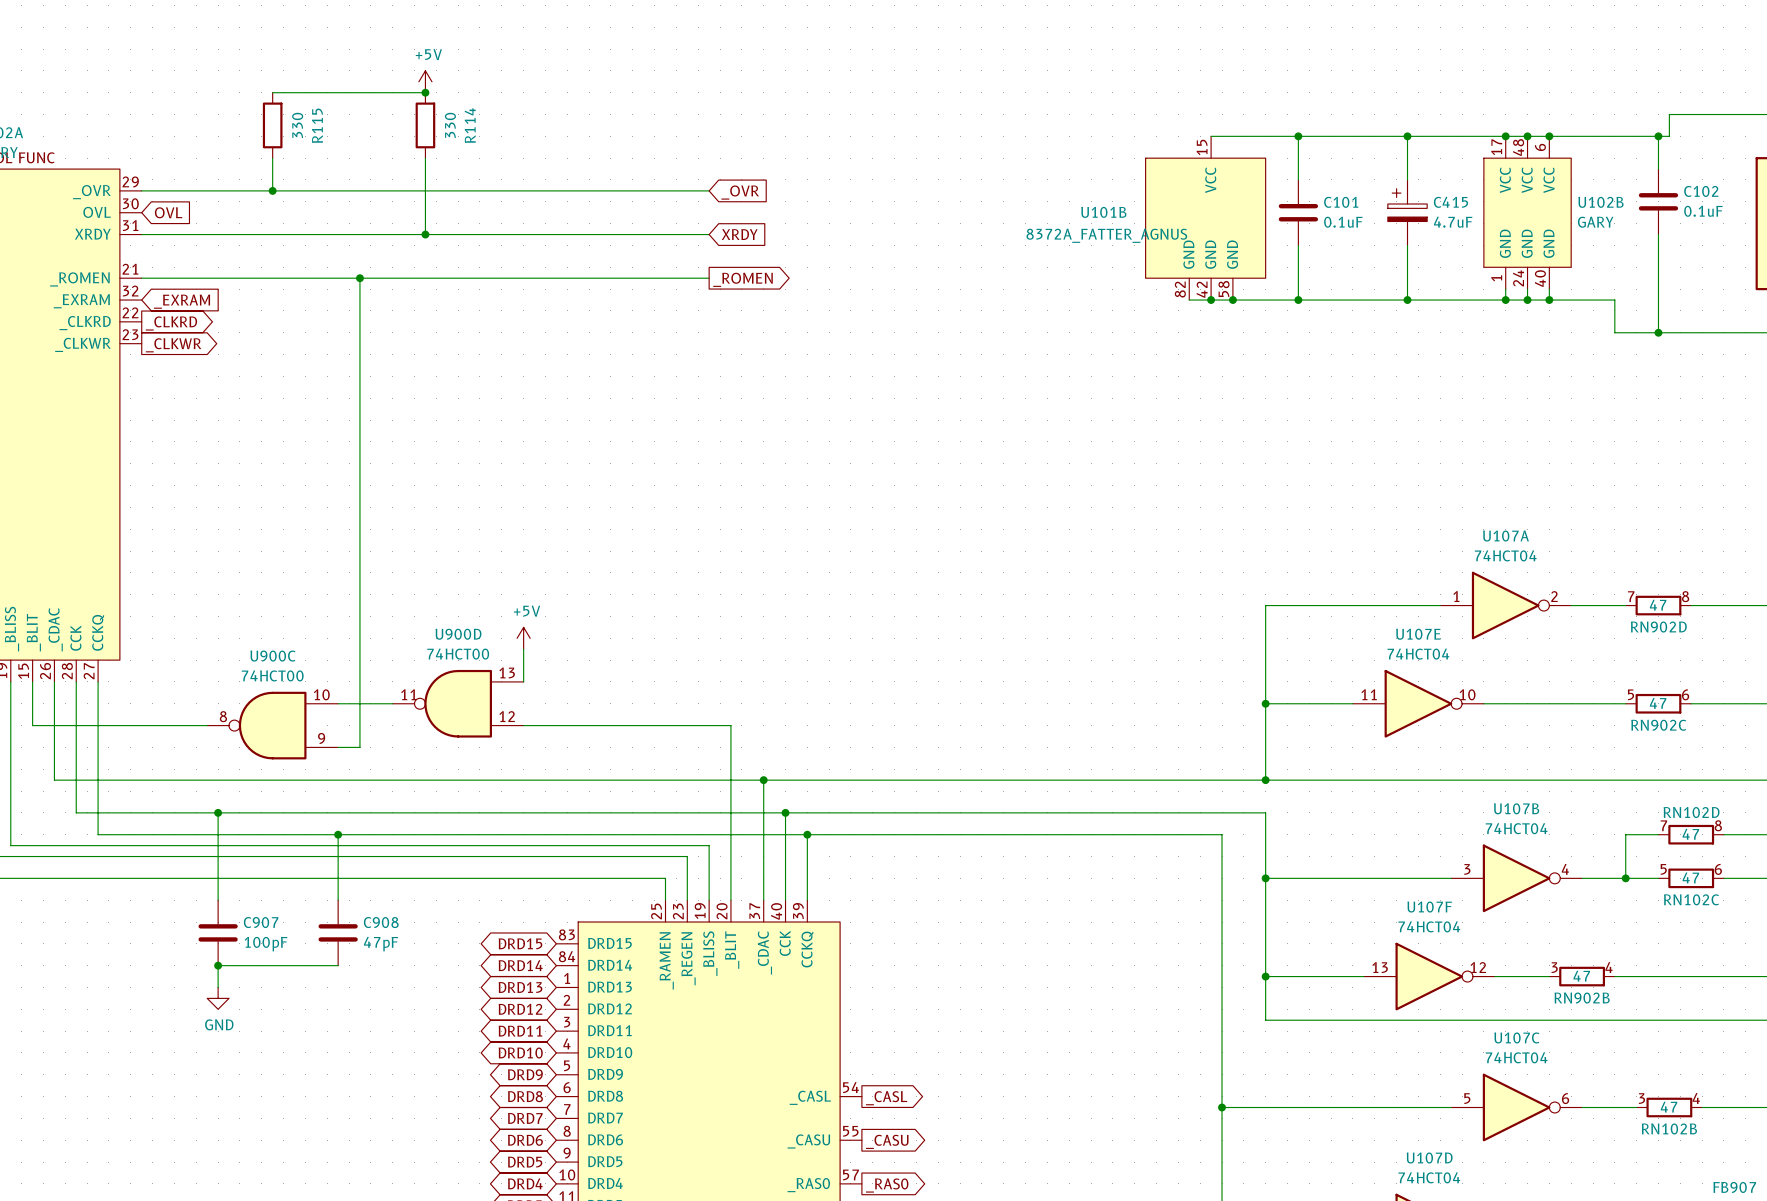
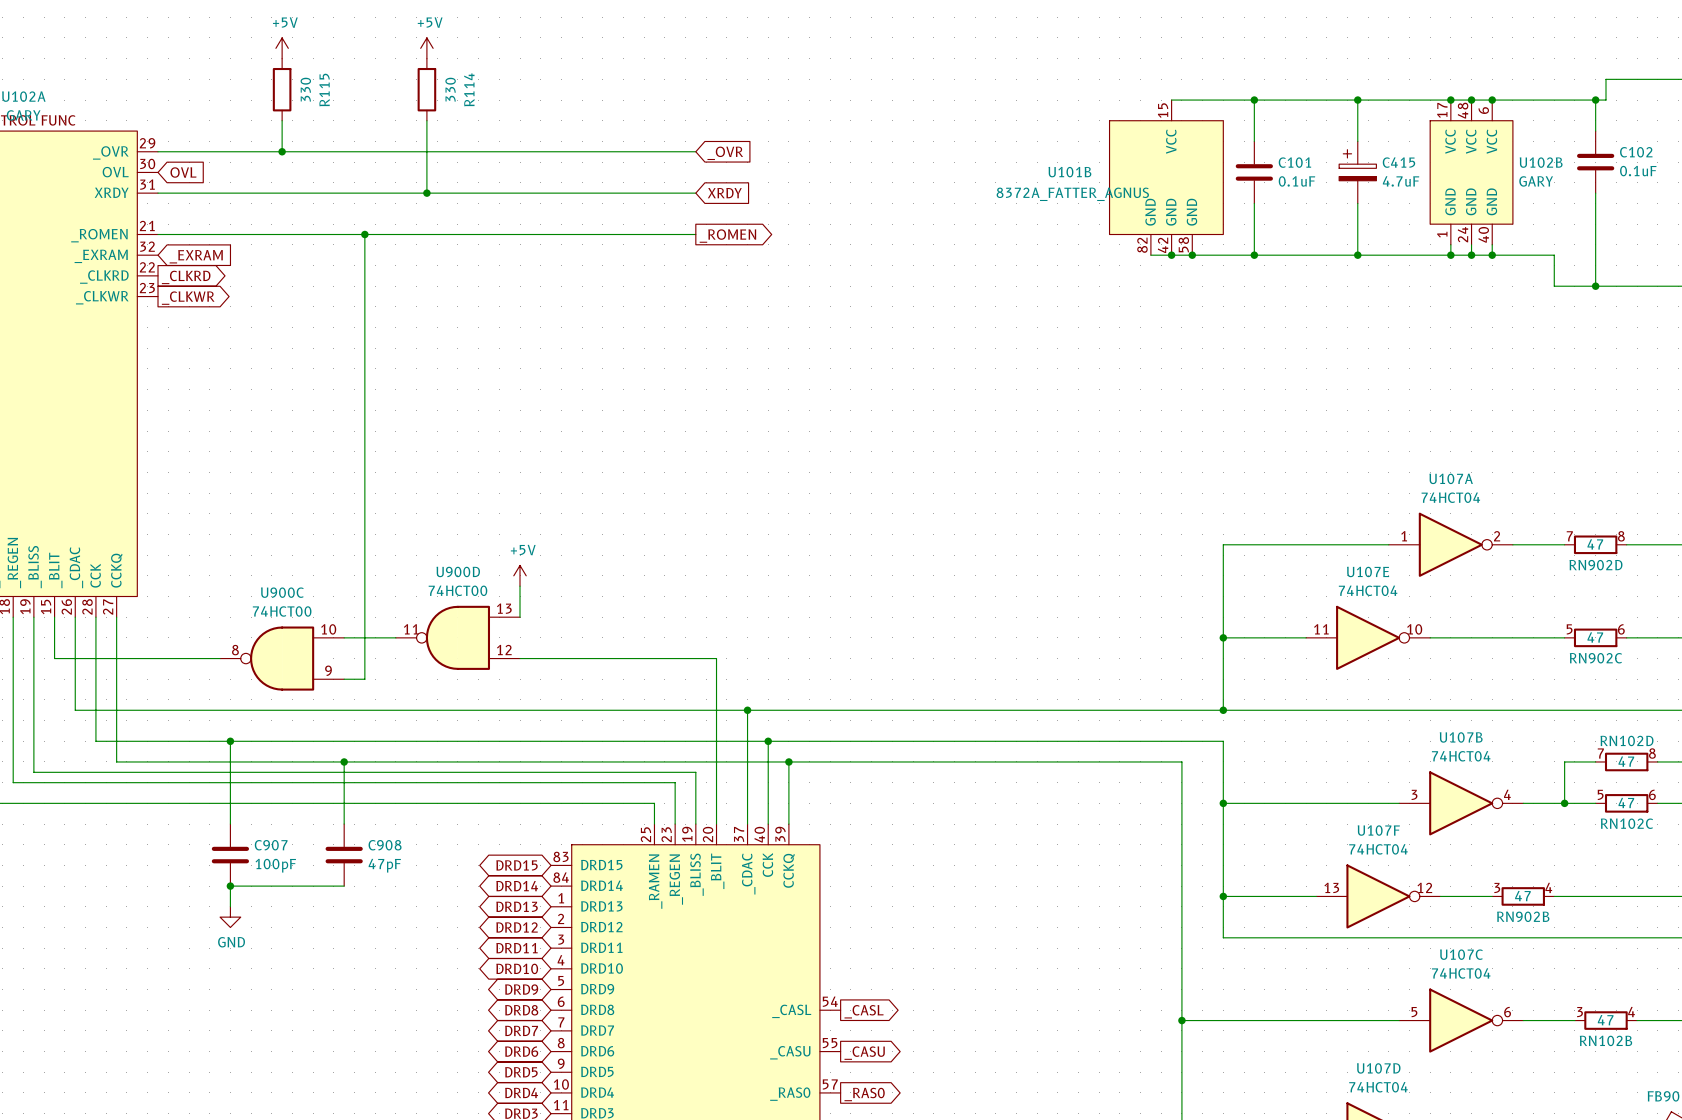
power symbol: none -> +5V (282, 48)
wire: (272, 92) (425, 92) -> none
junction: (425, 92) -> none

